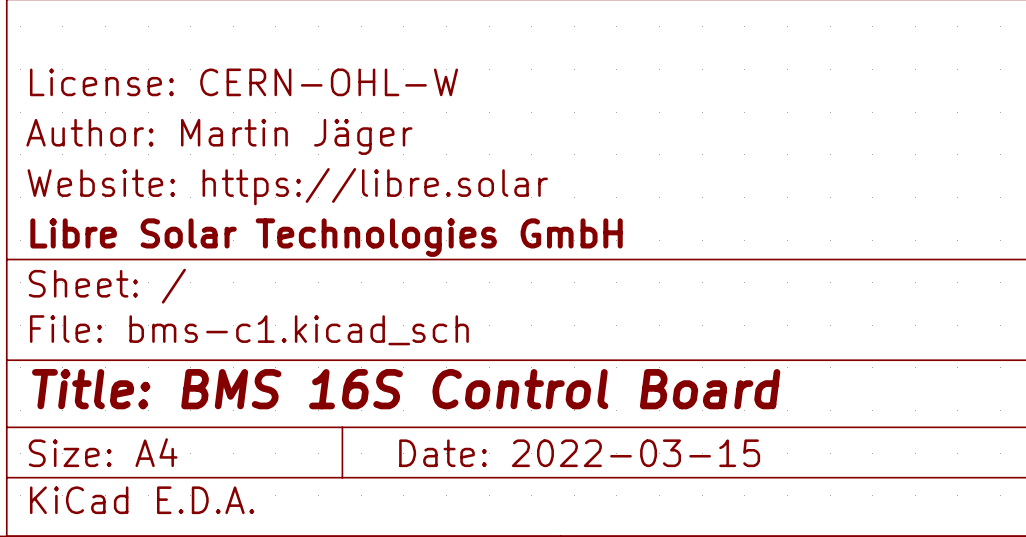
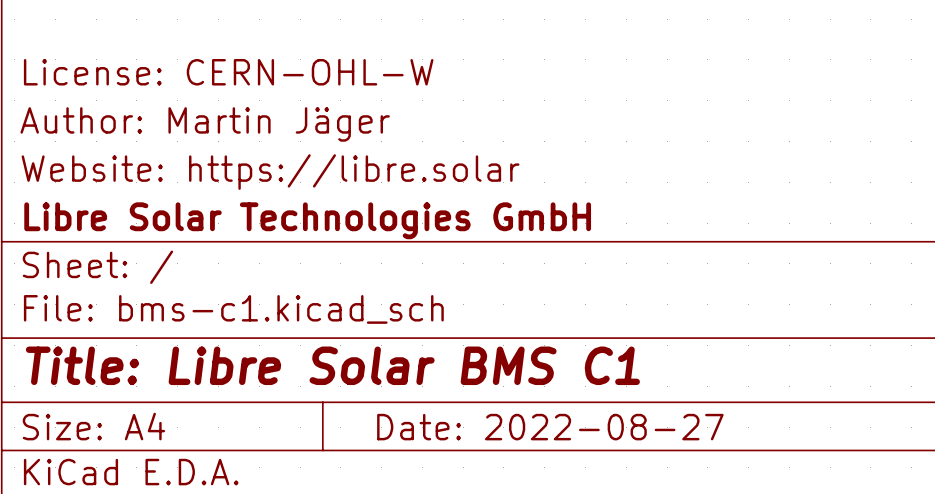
title block: Title: BMS 16S Control Board (406, 389) -> Title: Libre Solar BMS C1 (332, 365)
title block: Date: 2022-03-15 (579, 453) -> Date: 2022-08-27 (550, 427)

